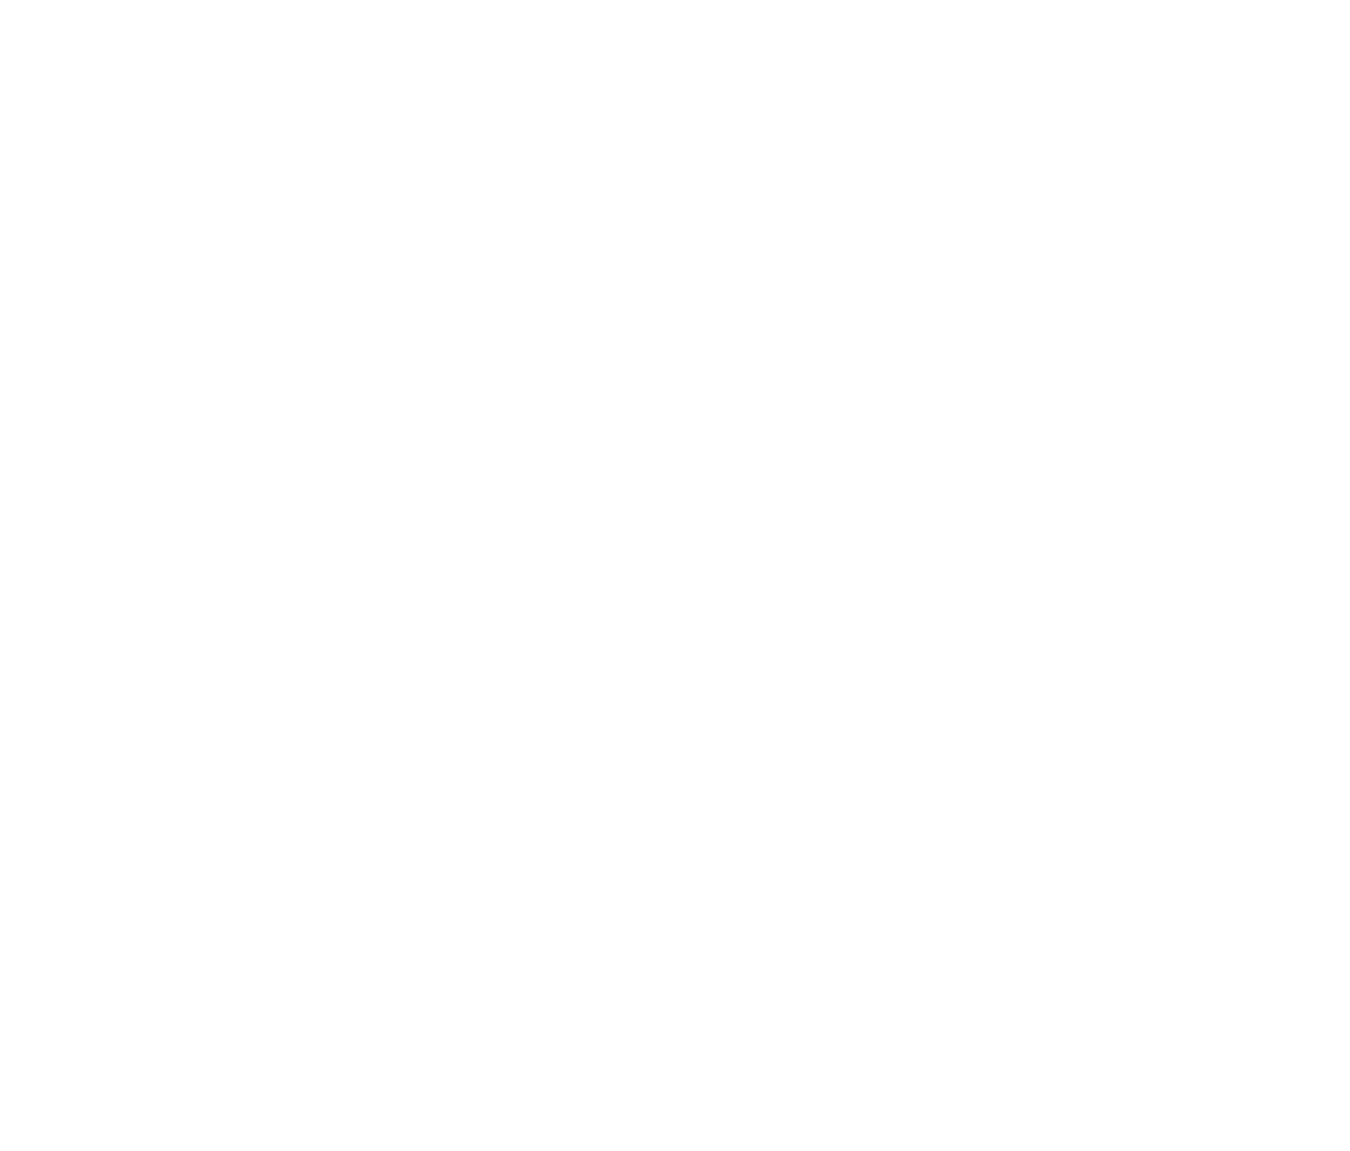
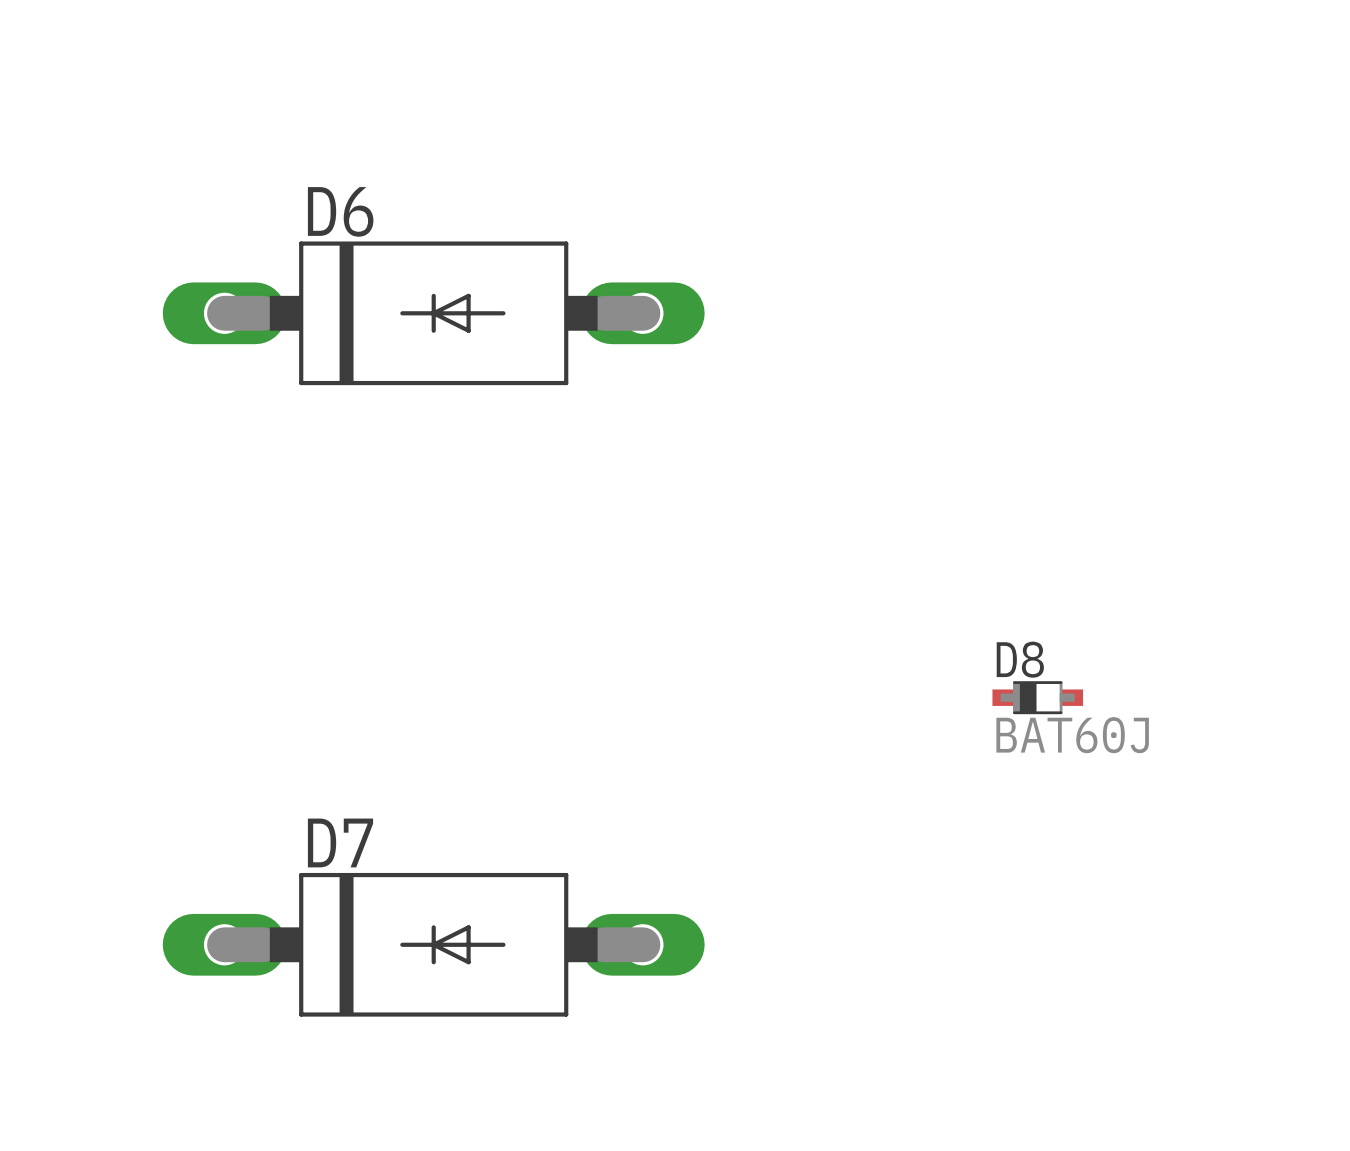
D6: none -> (433, 313)
D8: none -> BAT60J (1037, 697)
D7: none -> (433, 944)

